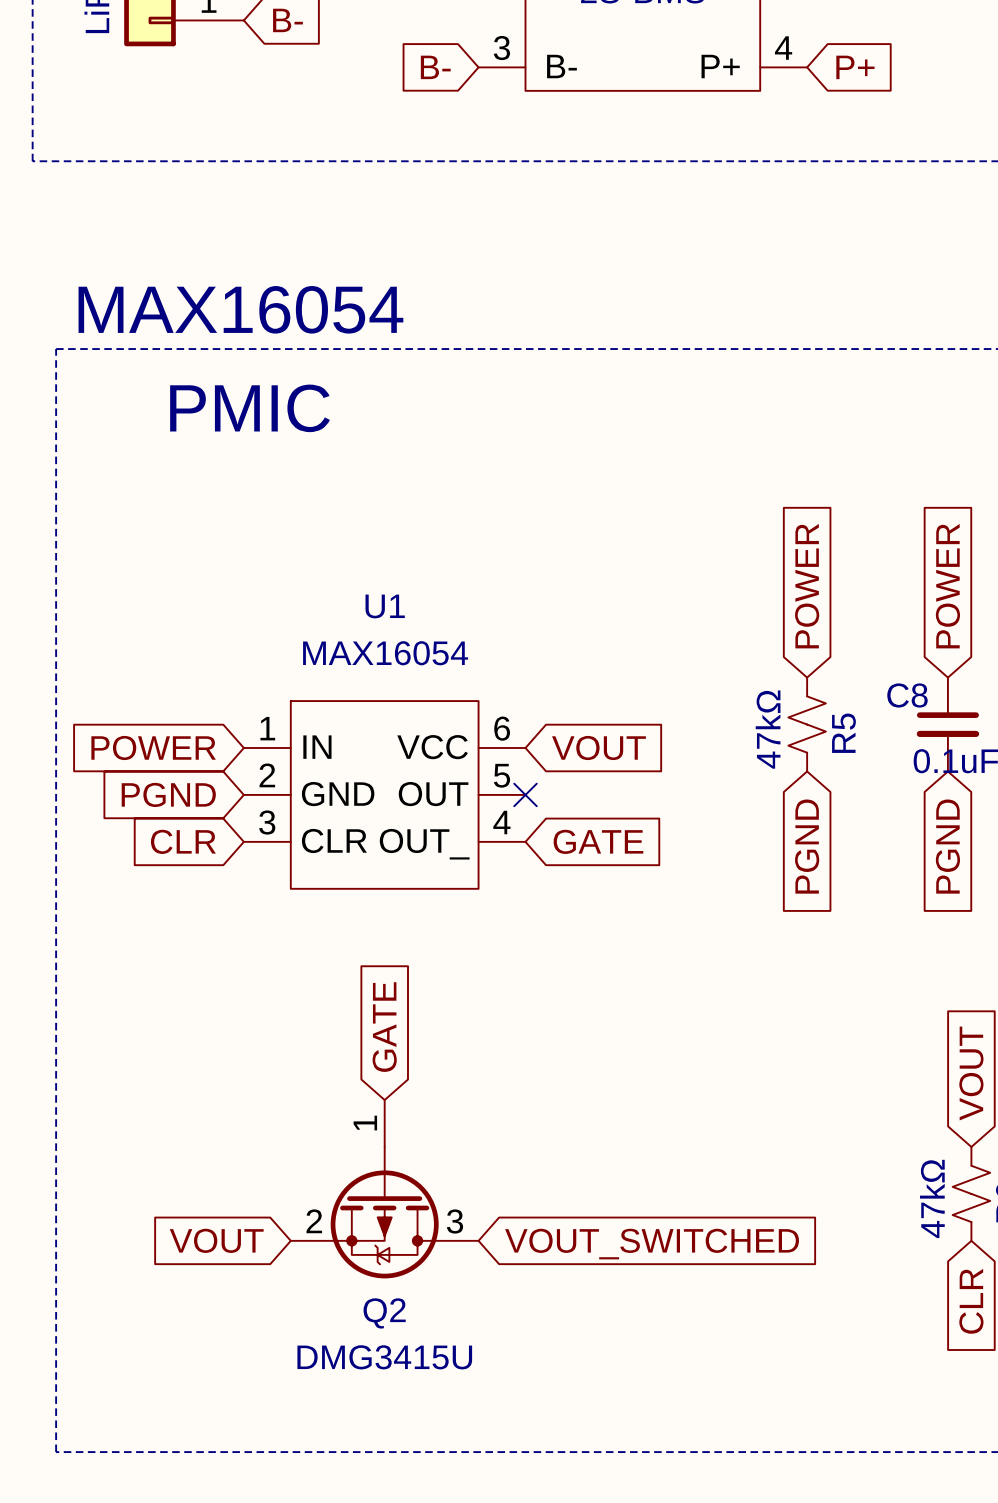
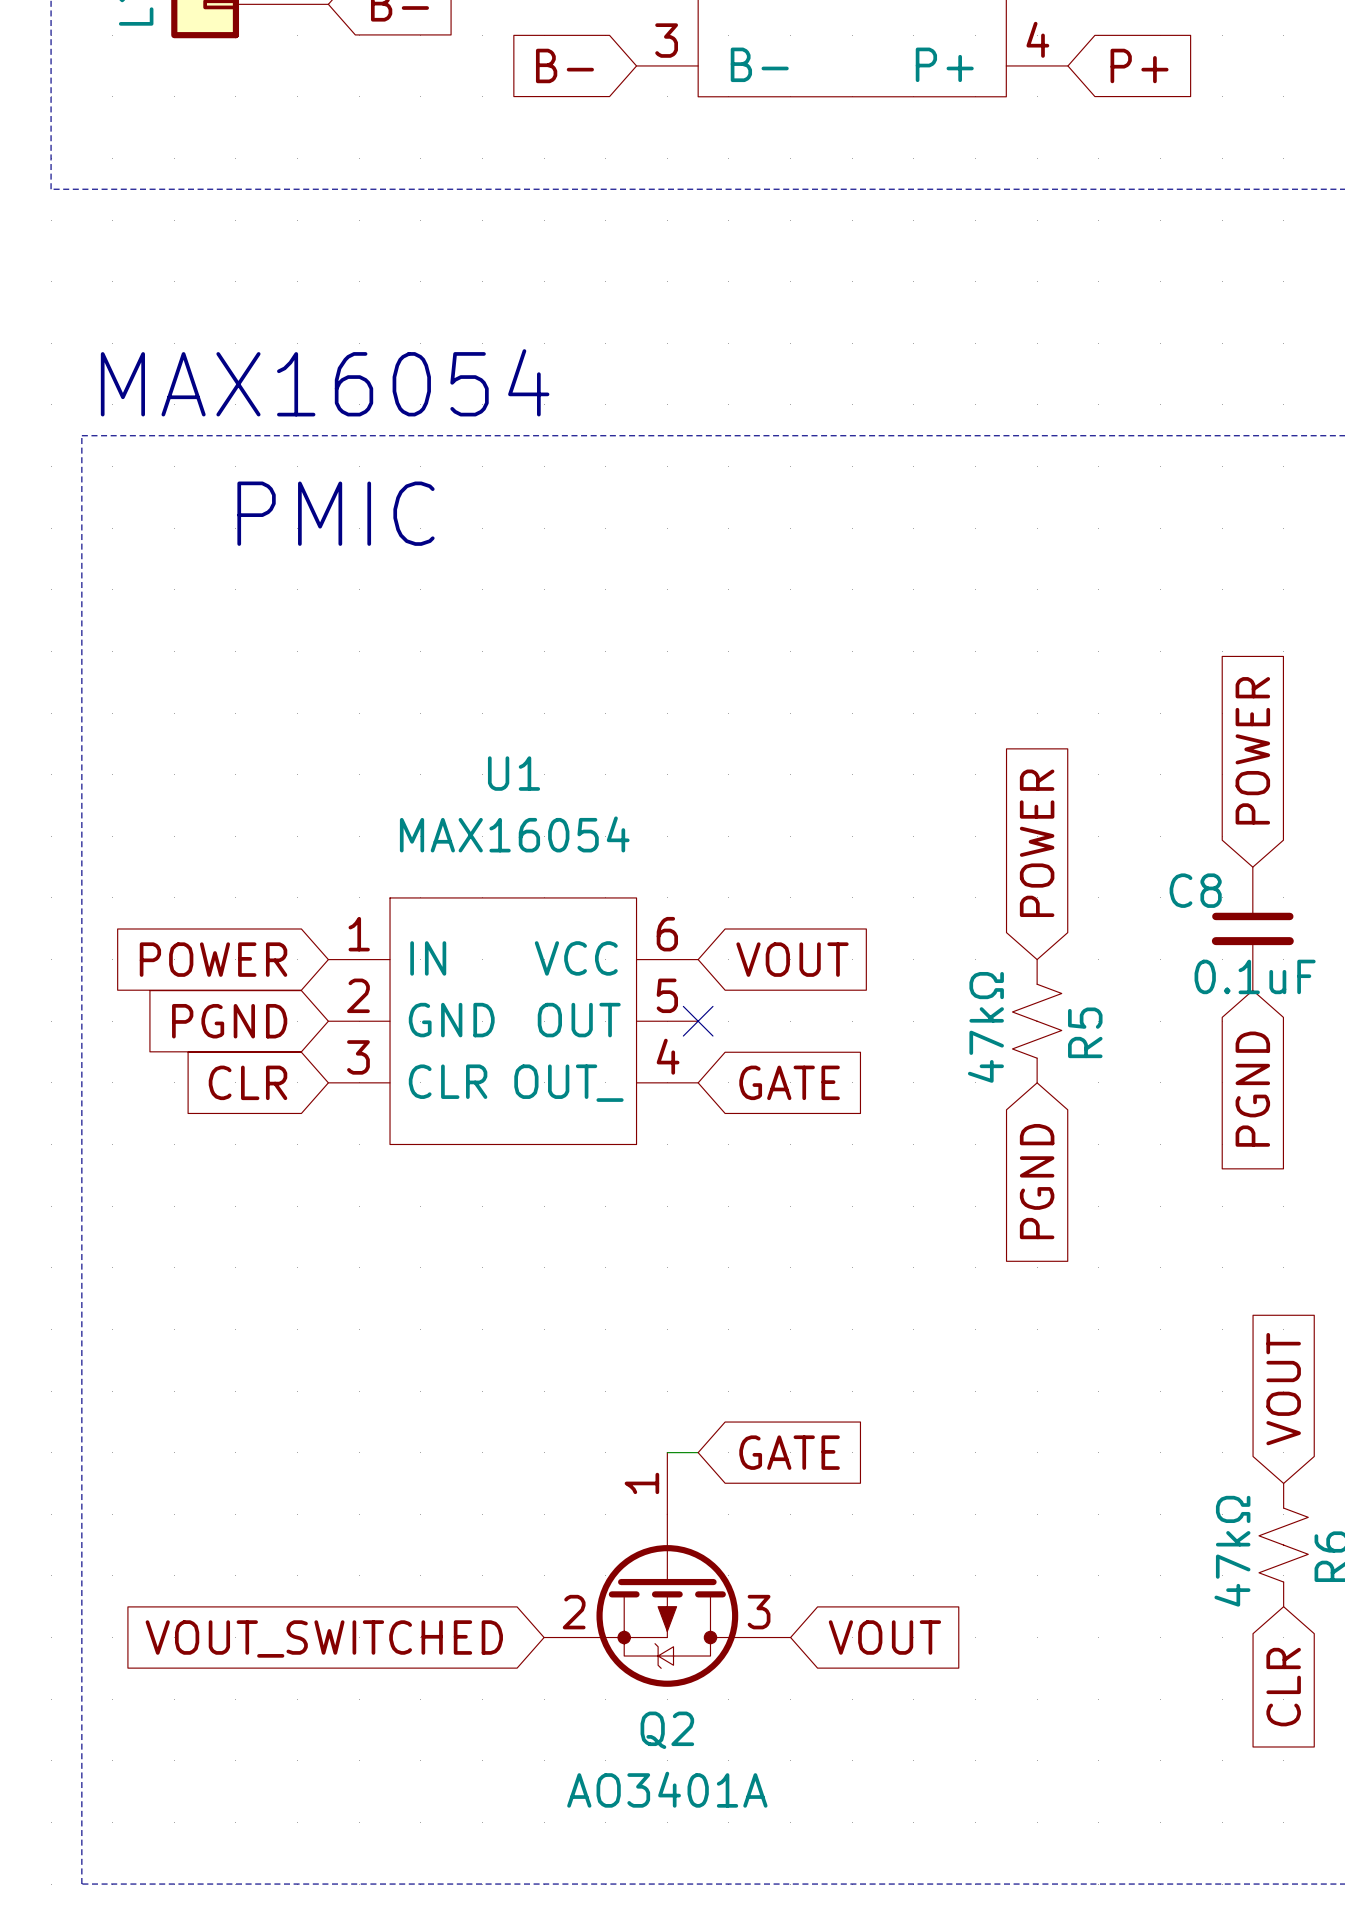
global label position: POWER (807, 586) -> POWER (1037, 843)
R5 position: (807, 724) -> (1037, 1021)
global label position: PGND (807, 846) -> PGND (1037, 1181)
global label rotation: 0° (384, 1027) -> 90° clockwise (789, 1452)
global label position: GATE (384, 1027) -> GATE (789, 1452)
wire: none -> (667, 1452) (698, 1452)
Q2 position: (384, 1189) -> (667, 1569)
global label rotation: 0° (216, 1240) -> 180° (884, 1637)
global label position: VOUT (216, 1240) -> VOUT (884, 1637)
global label rotation: 0° (652, 1244) -> 180° (324, 1638)
global label position: VOUT_SWITCHED (652, 1244) -> VOUT_SWITCHED (324, 1638)
Q2 value: DMG3415U (384, 1357) -> AO3401A (667, 1789)

